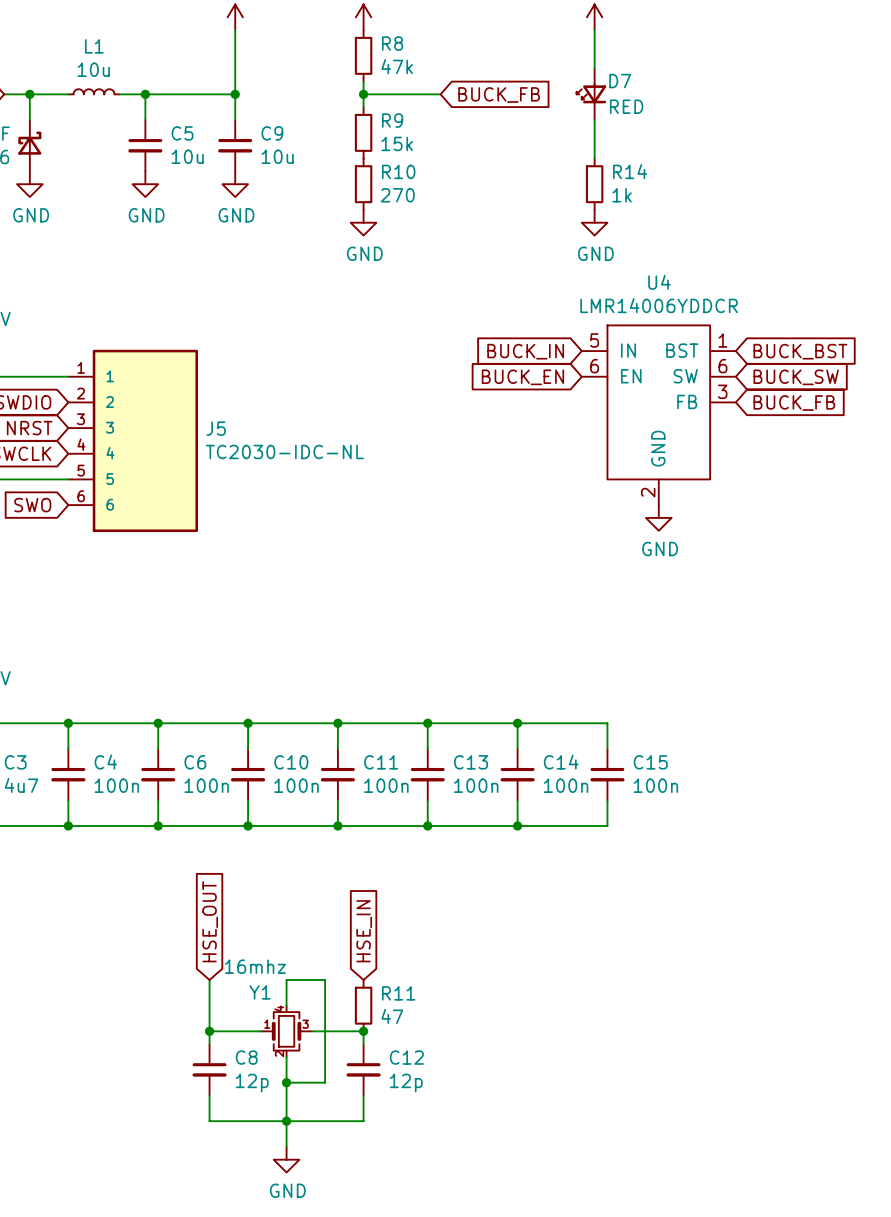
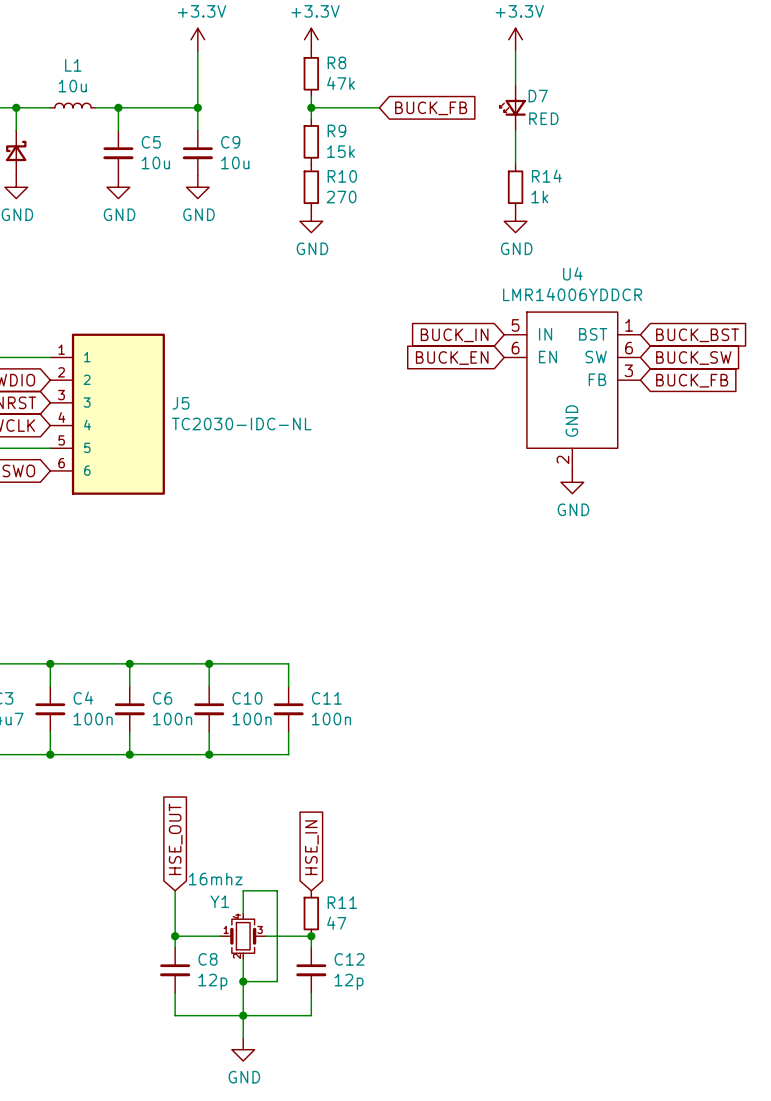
wire: (337, 723) (607, 723) (607, 748) -> none
junction: (337, 723) -> none
wire: (427, 723) (427, 748) -> none
junction: (427, 723) -> none
wire: (517, 723) (517, 748) -> none
junction: (517, 723) -> none
C13: 100n (427, 774) -> none
C14: 100n (517, 774) -> none
C15: 100n (607, 774) -> none
wire: (427, 800) (427, 825) -> none
wire: (517, 800) (517, 825) -> none
wire: (607, 800) (607, 825) (337, 825) -> none
junction: (337, 825) -> none
junction: (427, 825) -> none
junction: (517, 825) -> none

